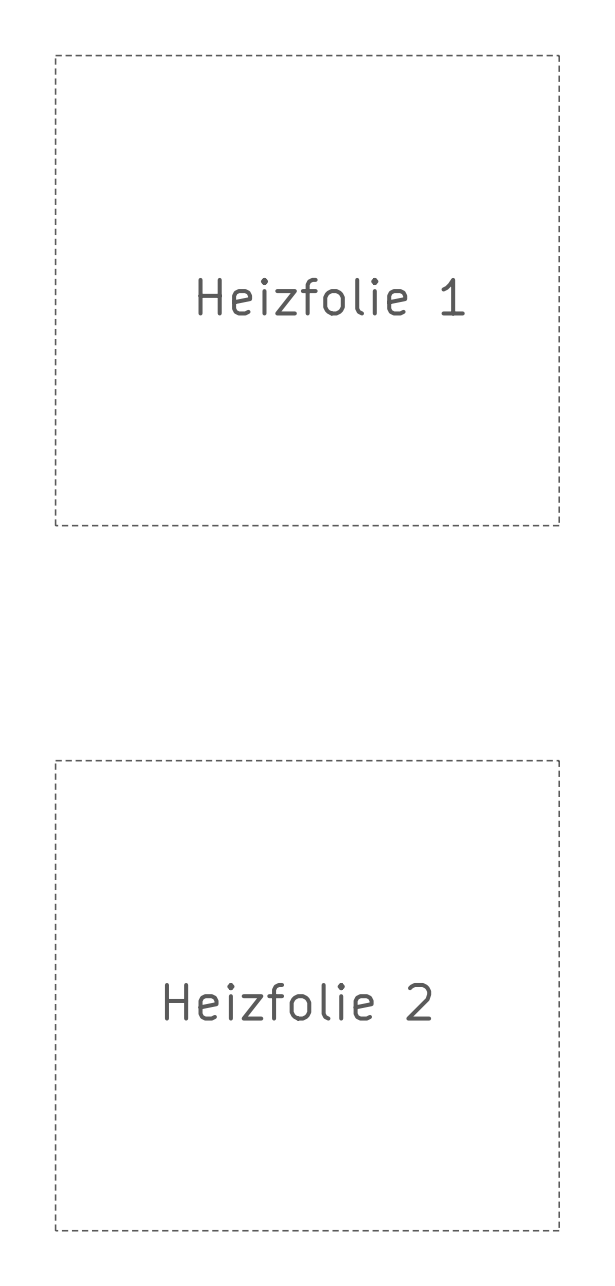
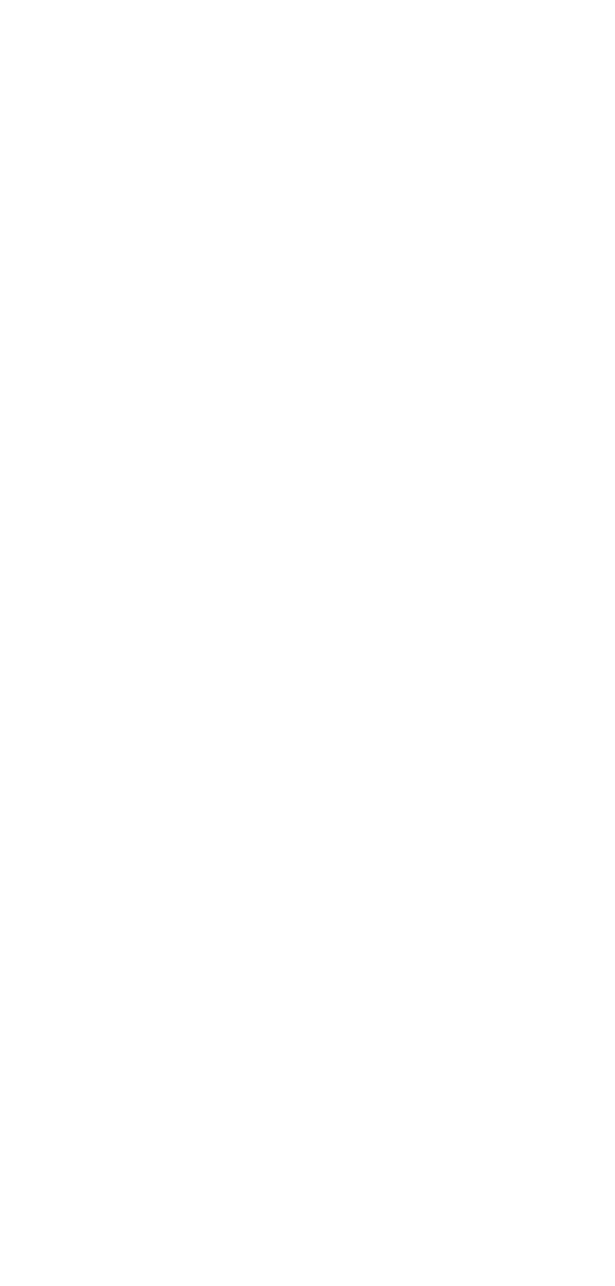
line: (55, 55) (559, 55) (559, 525) (55, 525) (55, 55) -> none
text: Heizfolie 1 (331, 296) -> none
line: (55, 760) (55, 1230) (559, 1230) (559, 760) (55, 760) -> none
text: Heizfolie 2 (298, 1001) -> none

